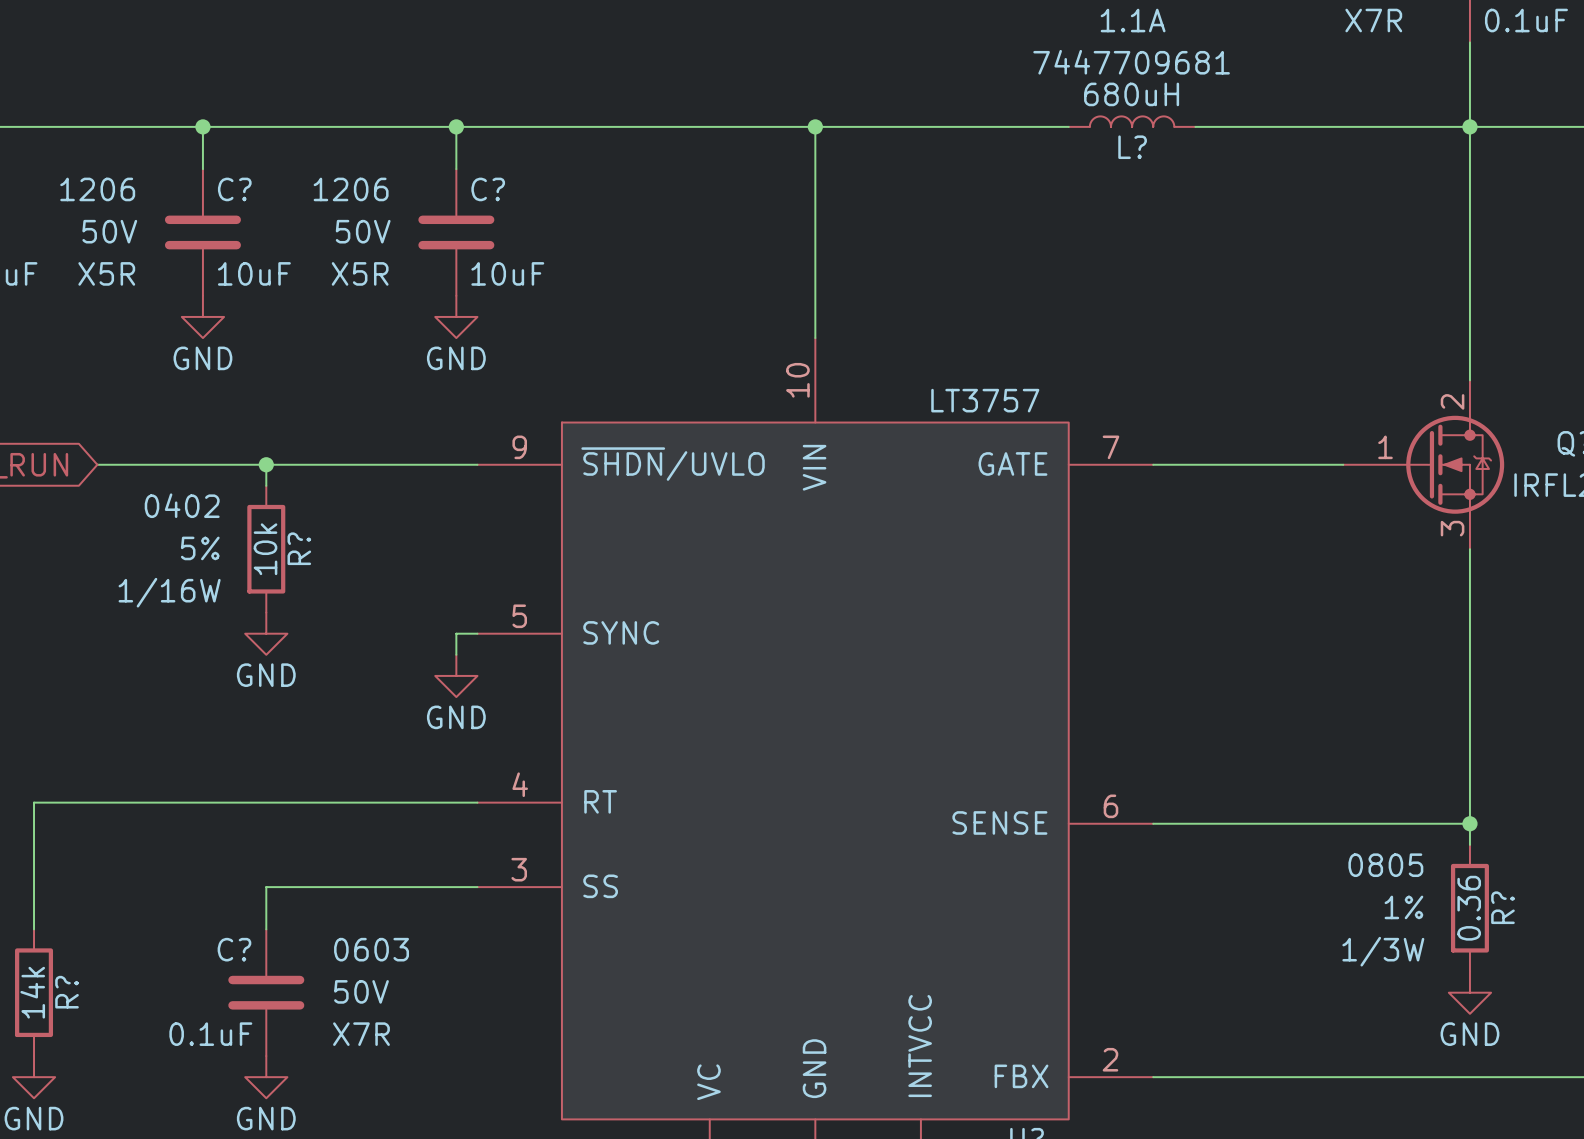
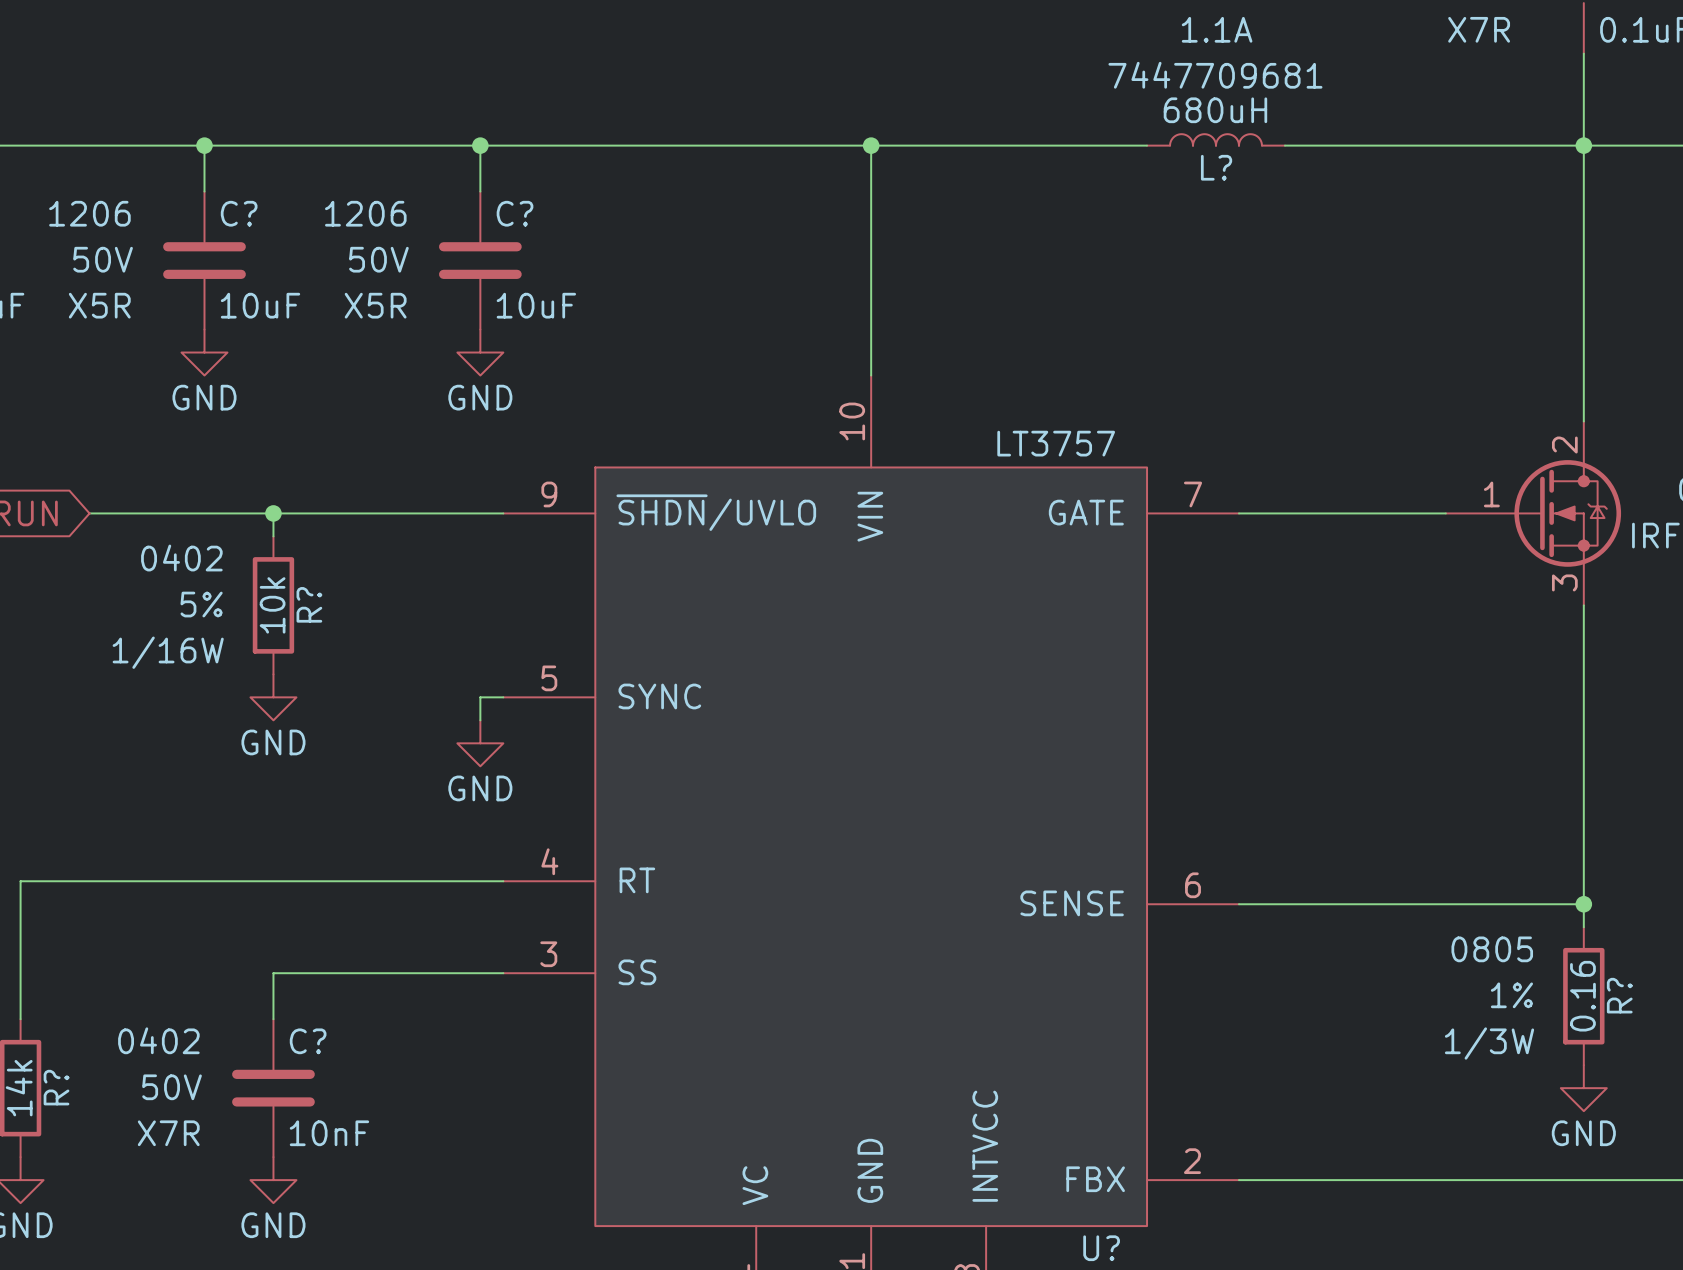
R? value: 0.36 (1469, 908) -> 0.16 (1582, 996)
C? name position: C? (234, 949) -> C? (308, 1041)
C? text: 0603 (371, 949) -> 0402 (158, 1040)
C? text position: 50V (361, 991) -> 50V (172, 1087)
C? value: 0.1uF (210, 1034) -> 10nF (329, 1133)
C? text position: X7R (361, 1034) -> X7R (168, 1133)

